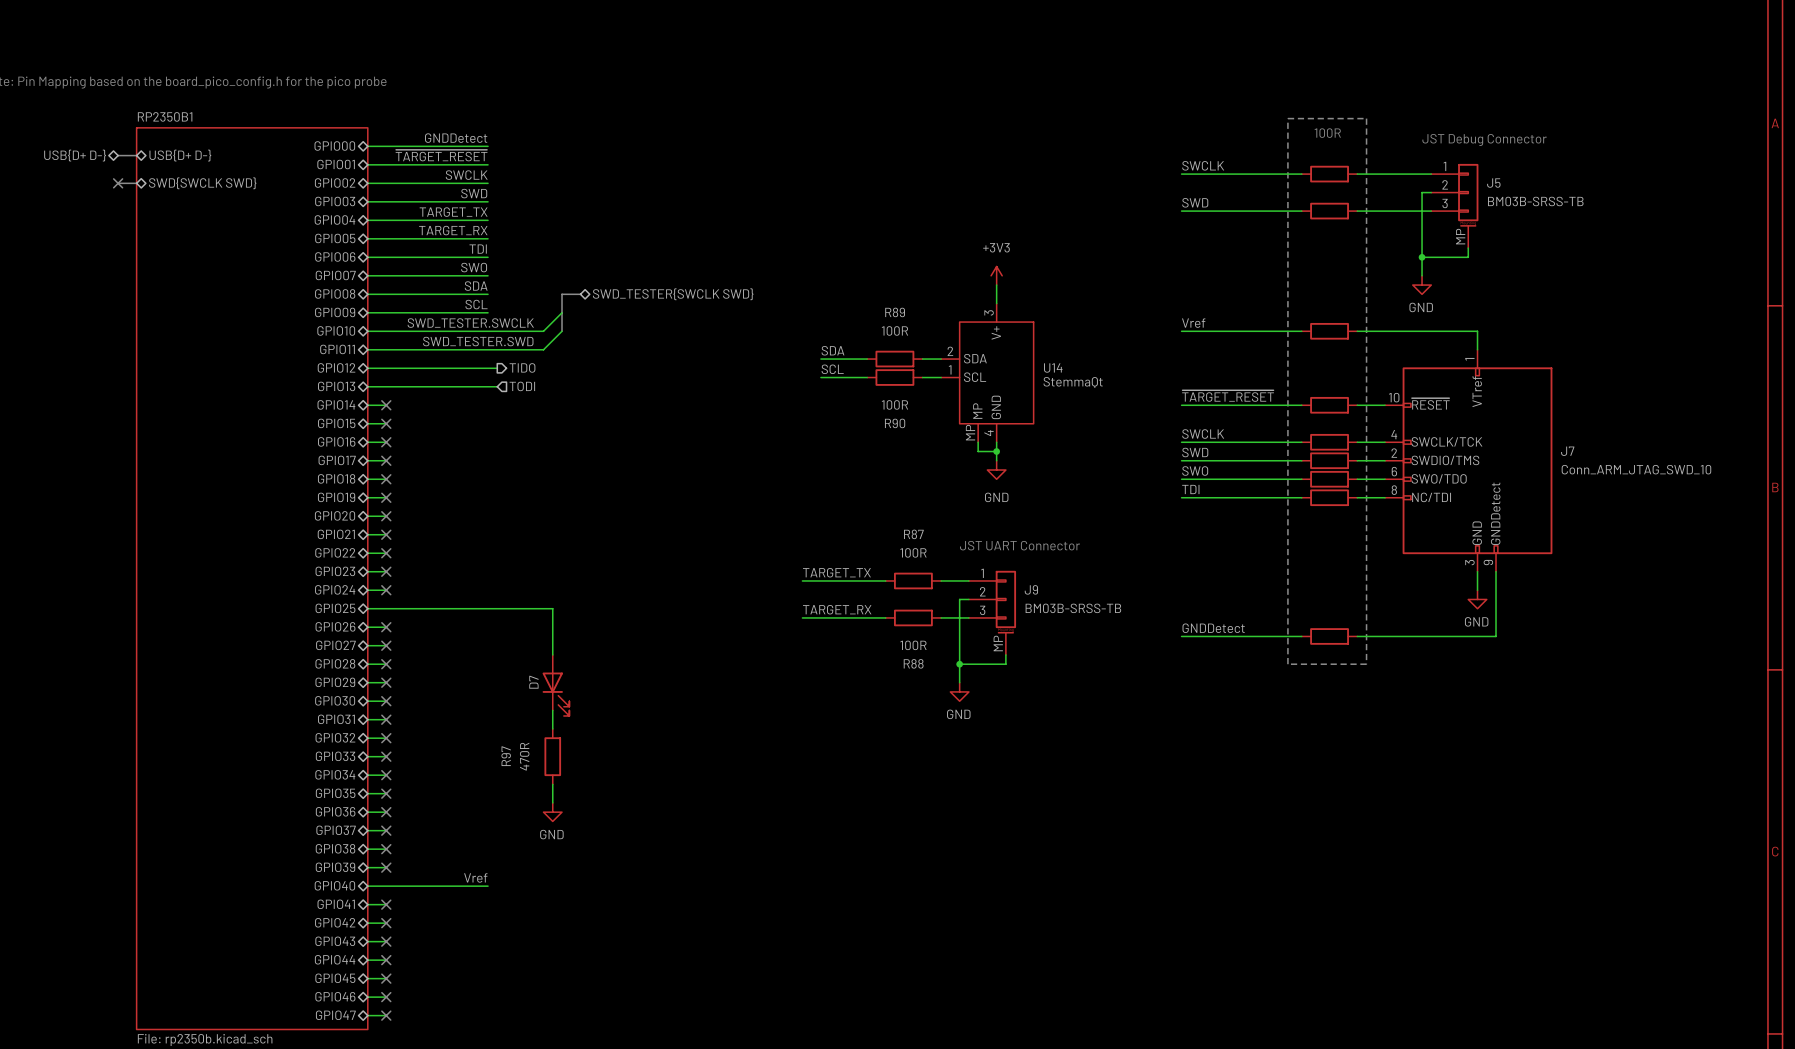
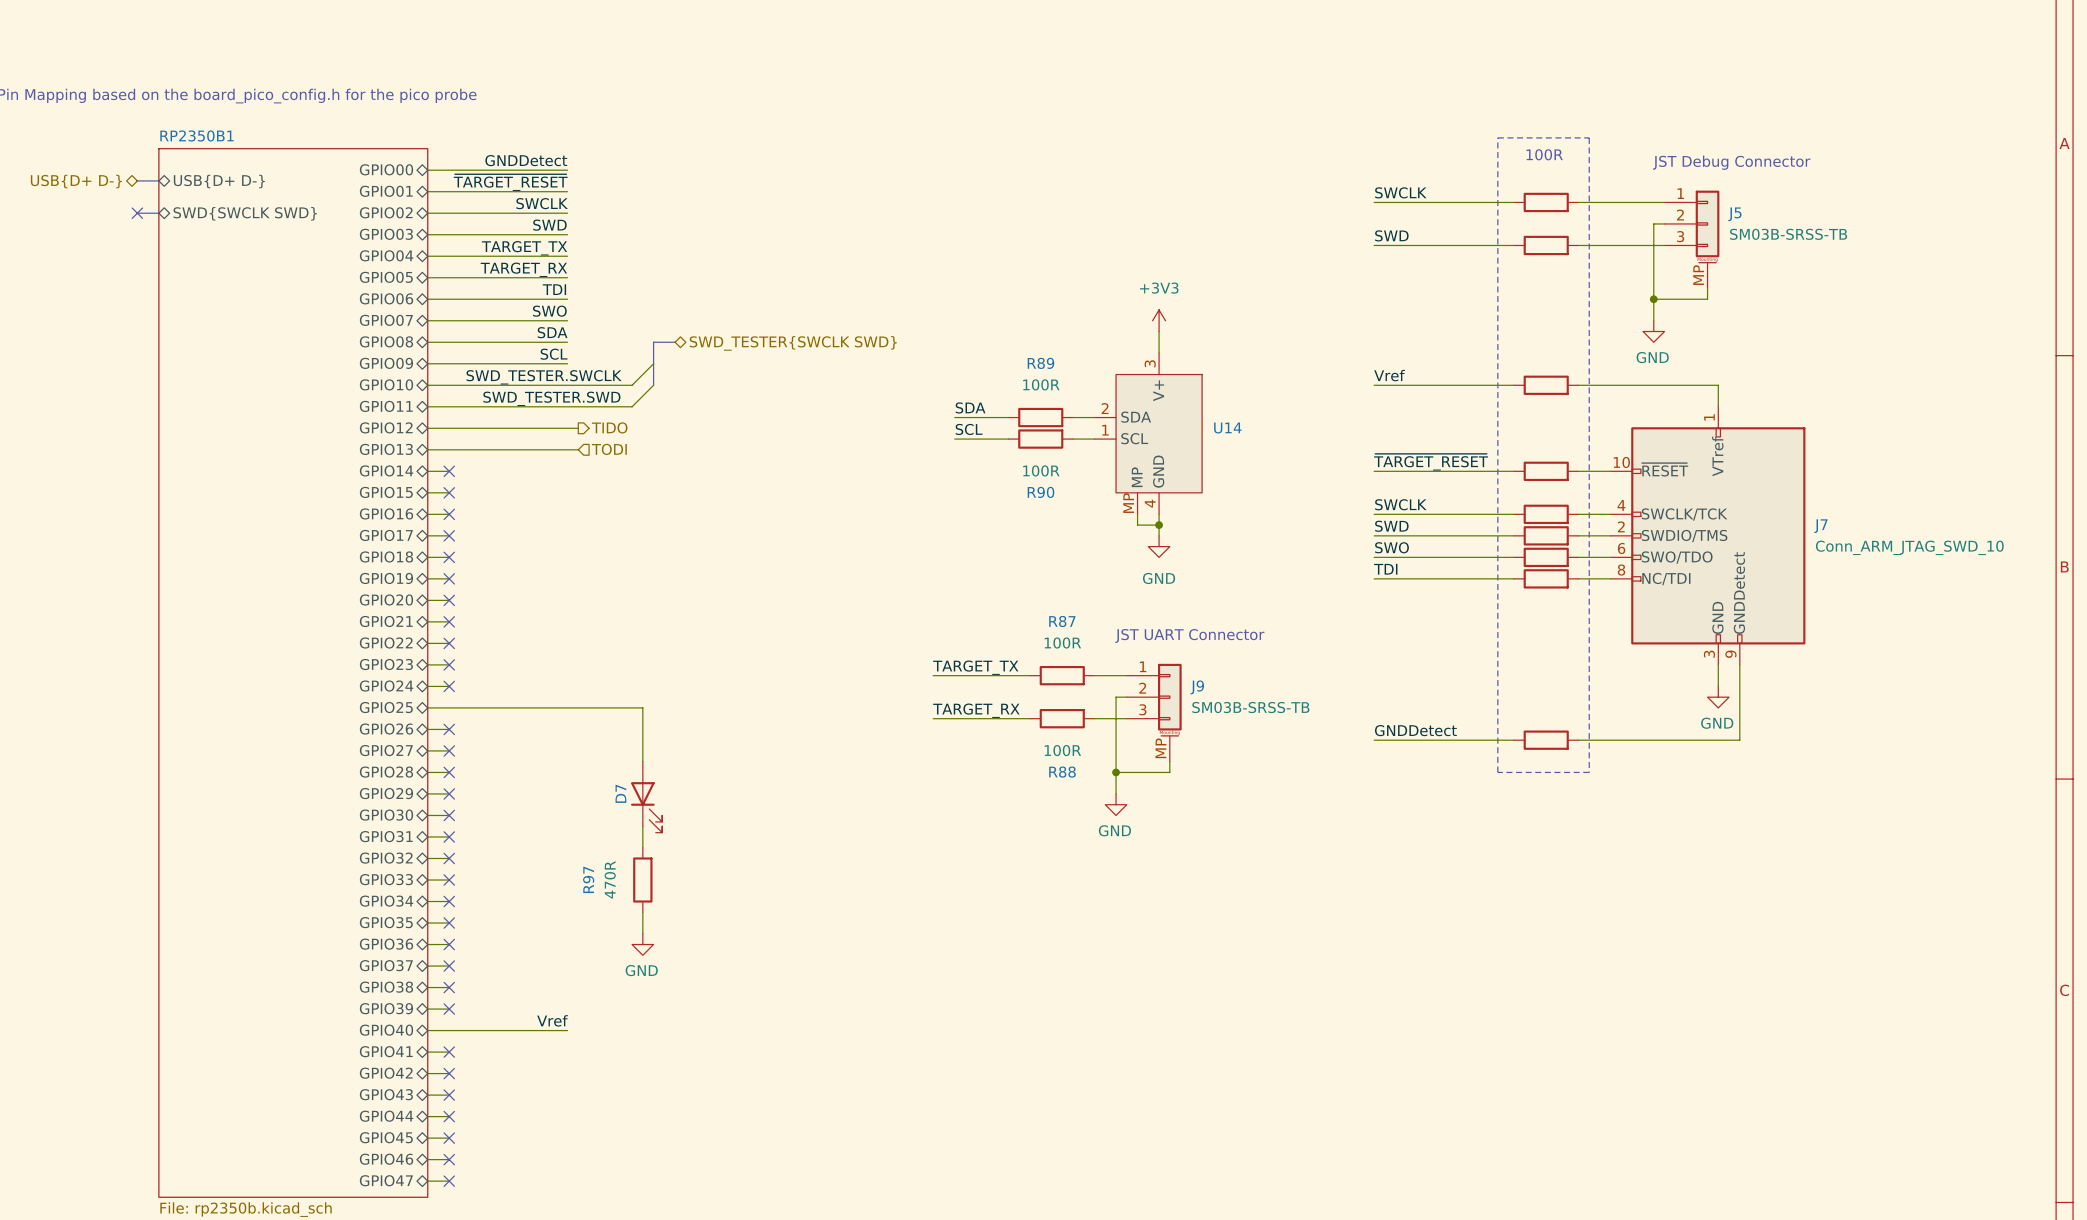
J5 value: BM03B-SRSS-TB (1535, 201) -> SM03B-SRSS-TB (1788, 234)
U14 value: StemmaQt (1073, 382) -> none
J9 value: BM03B-SRSS-TB (1073, 608) -> SM03B-SRSS-TB (1250, 707)

